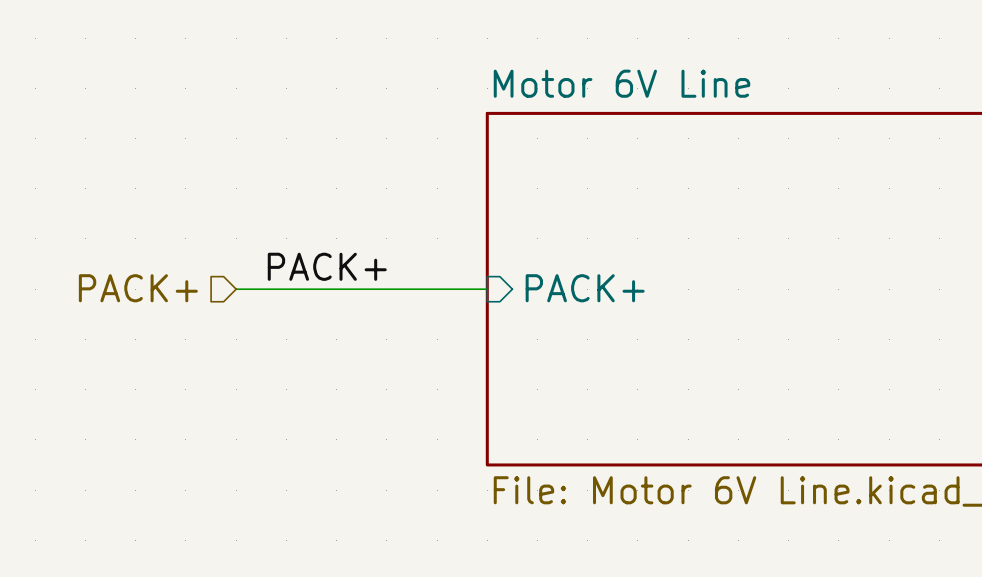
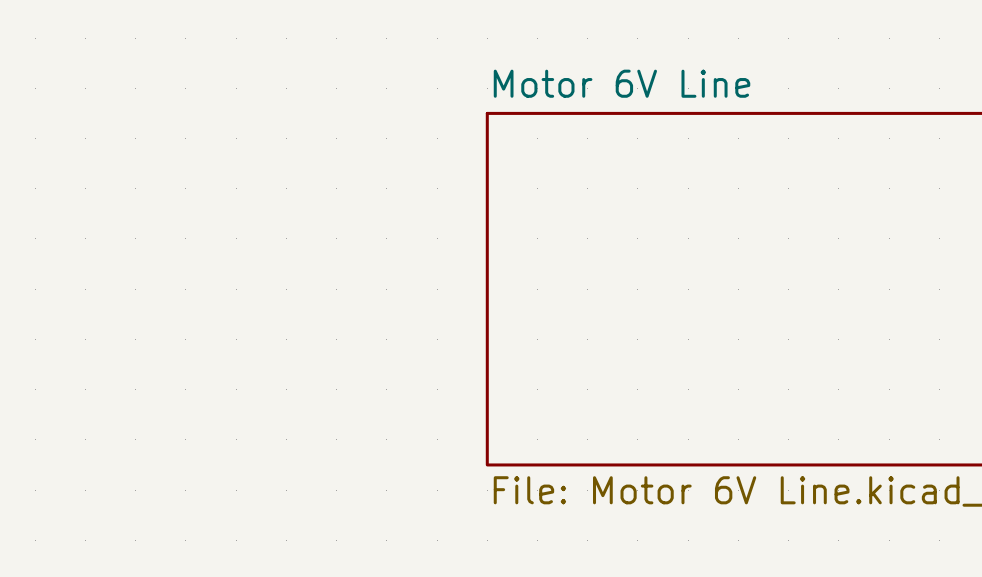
label: PACK+ (327, 266) -> none
hierarchical label: PACK+ (138, 288) -> none
sheet pin: PACK+ (585, 288) -> none
wire: (236, 289) (487, 289) -> none

